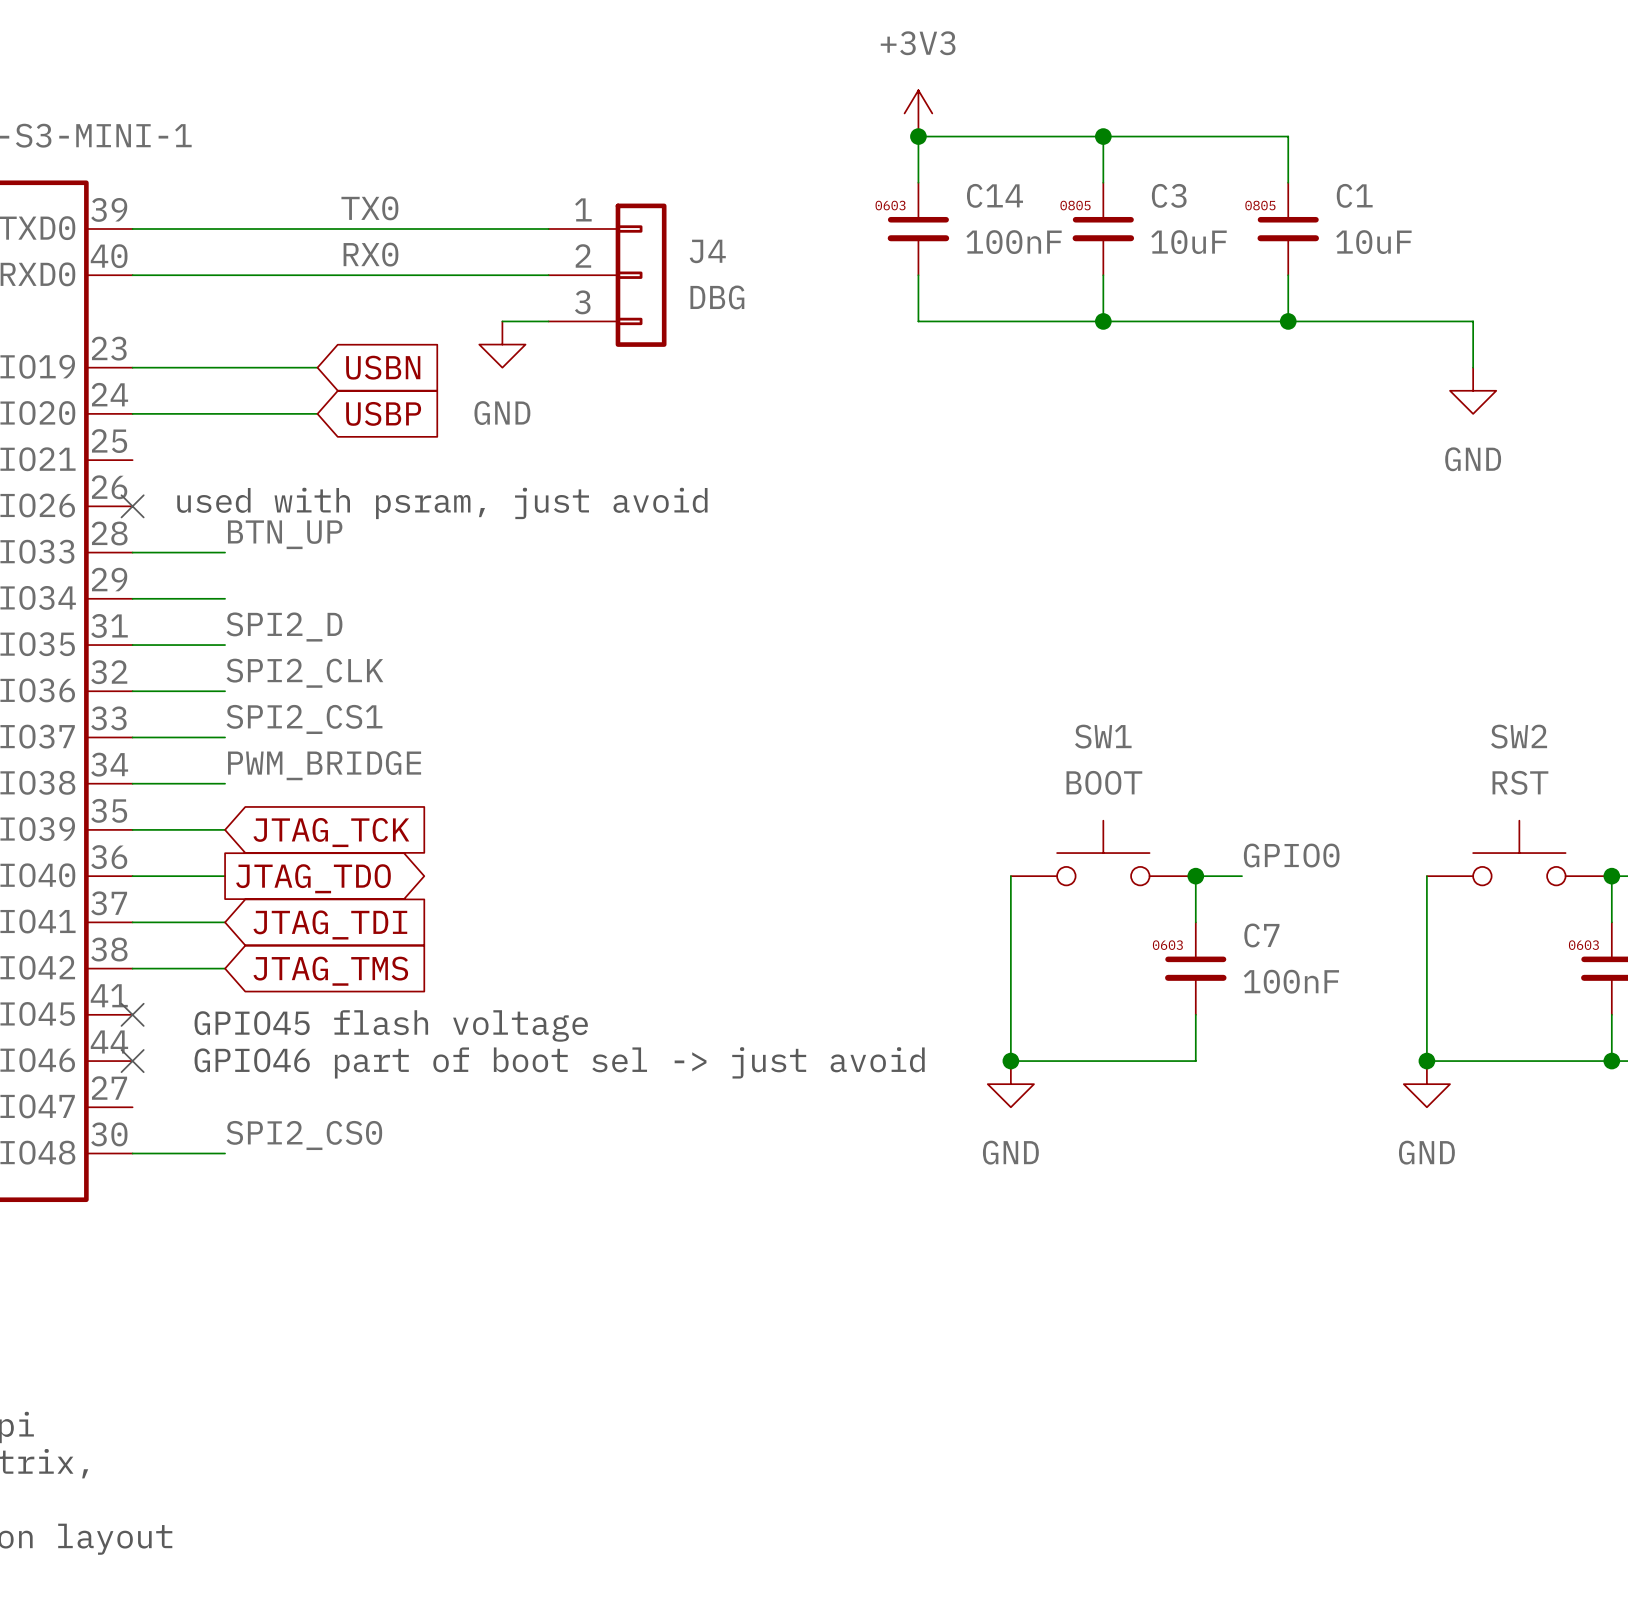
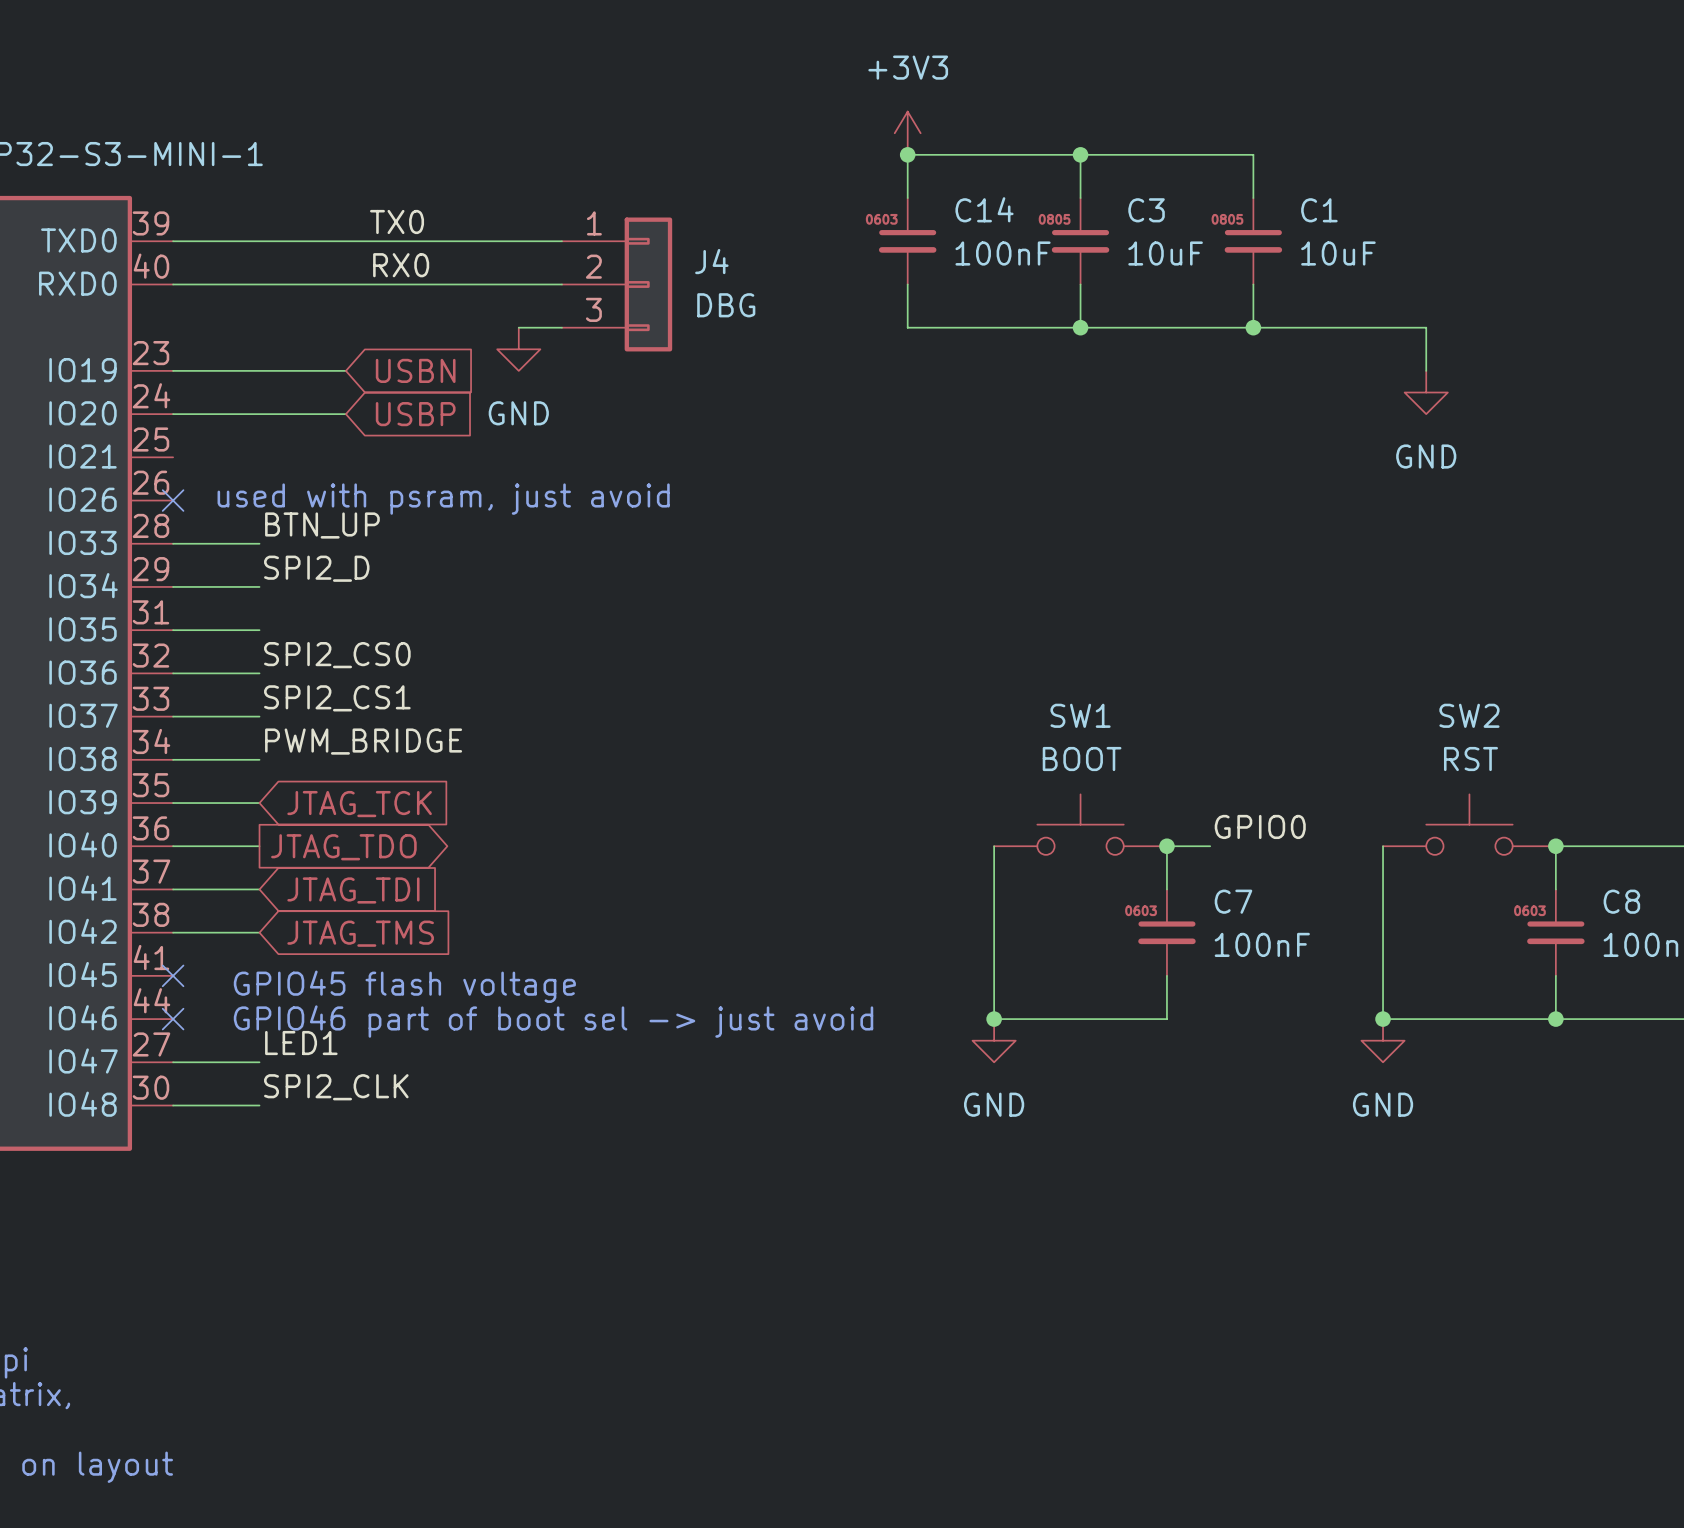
label position: SPI2_D (284, 627) -> SPI2_D (316, 568)
label: SPI2_CLK (304, 673) -> SPI2_CS0 (337, 655)
label: none -> LED1 (301, 1043)
wire: none -> (173, 1062) (259, 1062)
label: SPI2_CS0 (304, 1135) -> SPI2_CLK (336, 1087)

